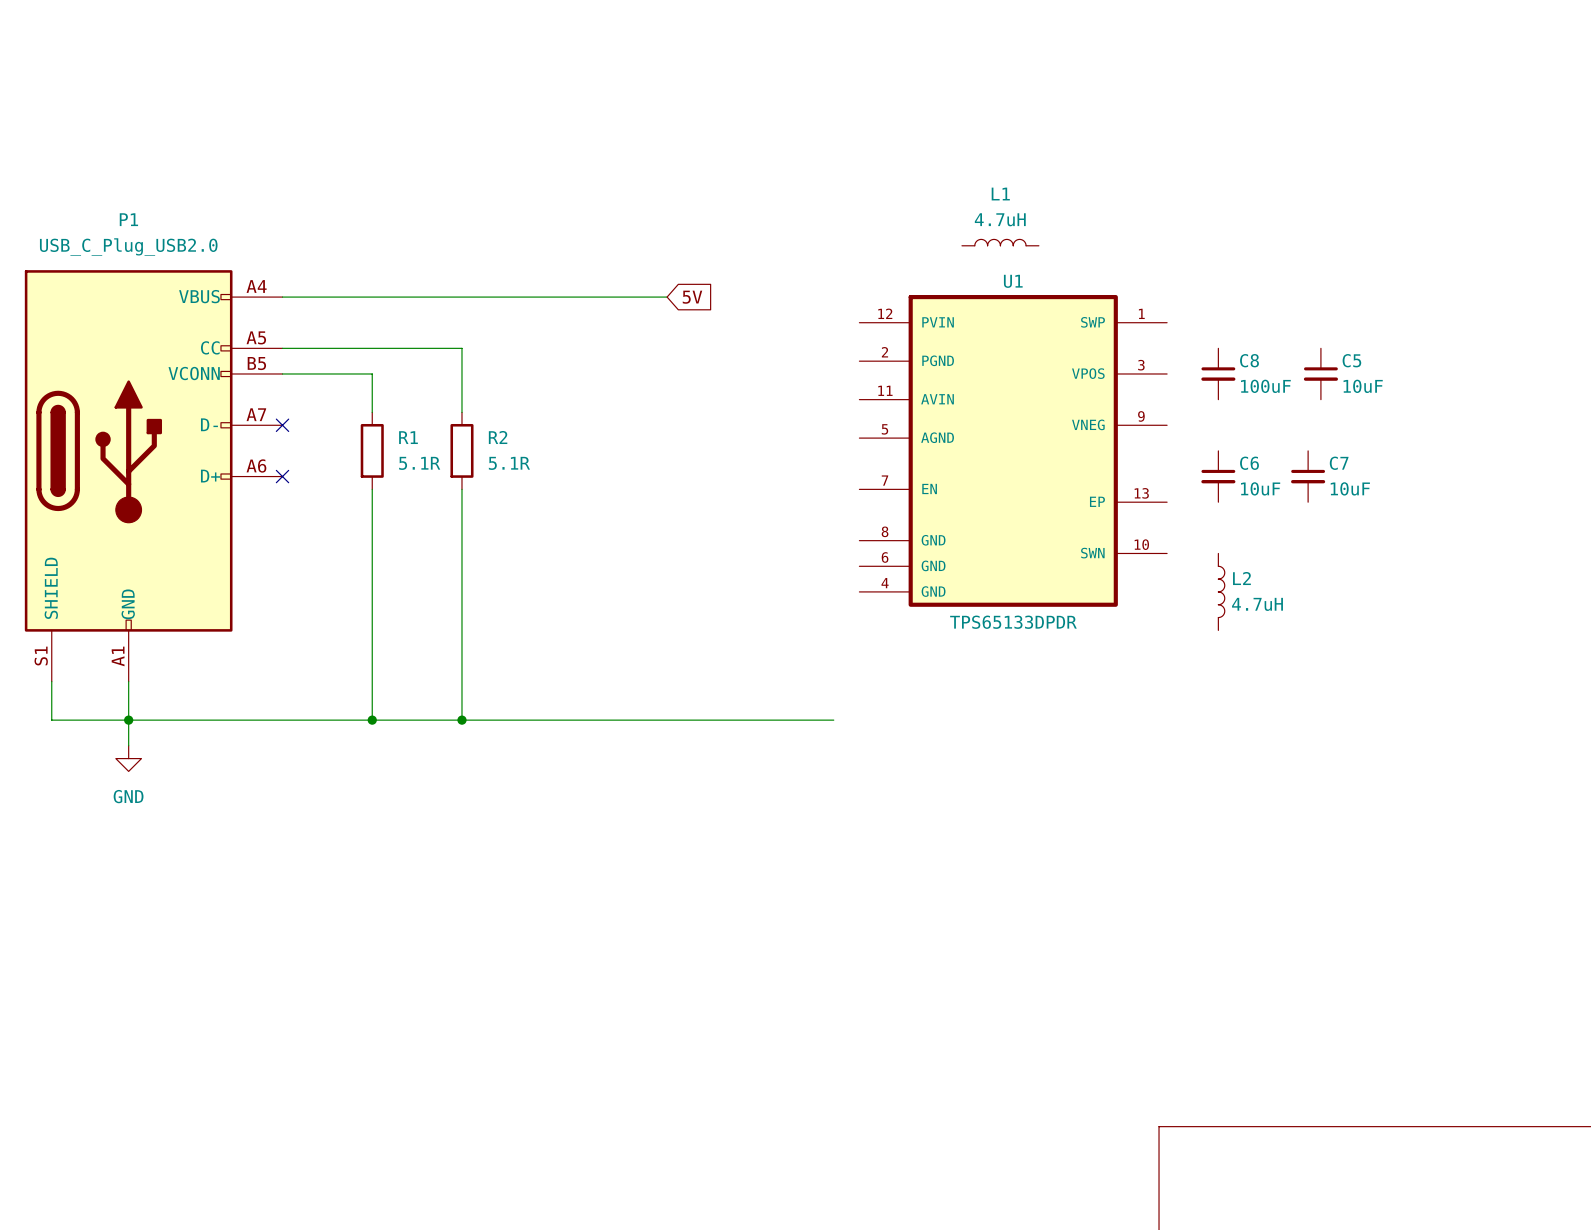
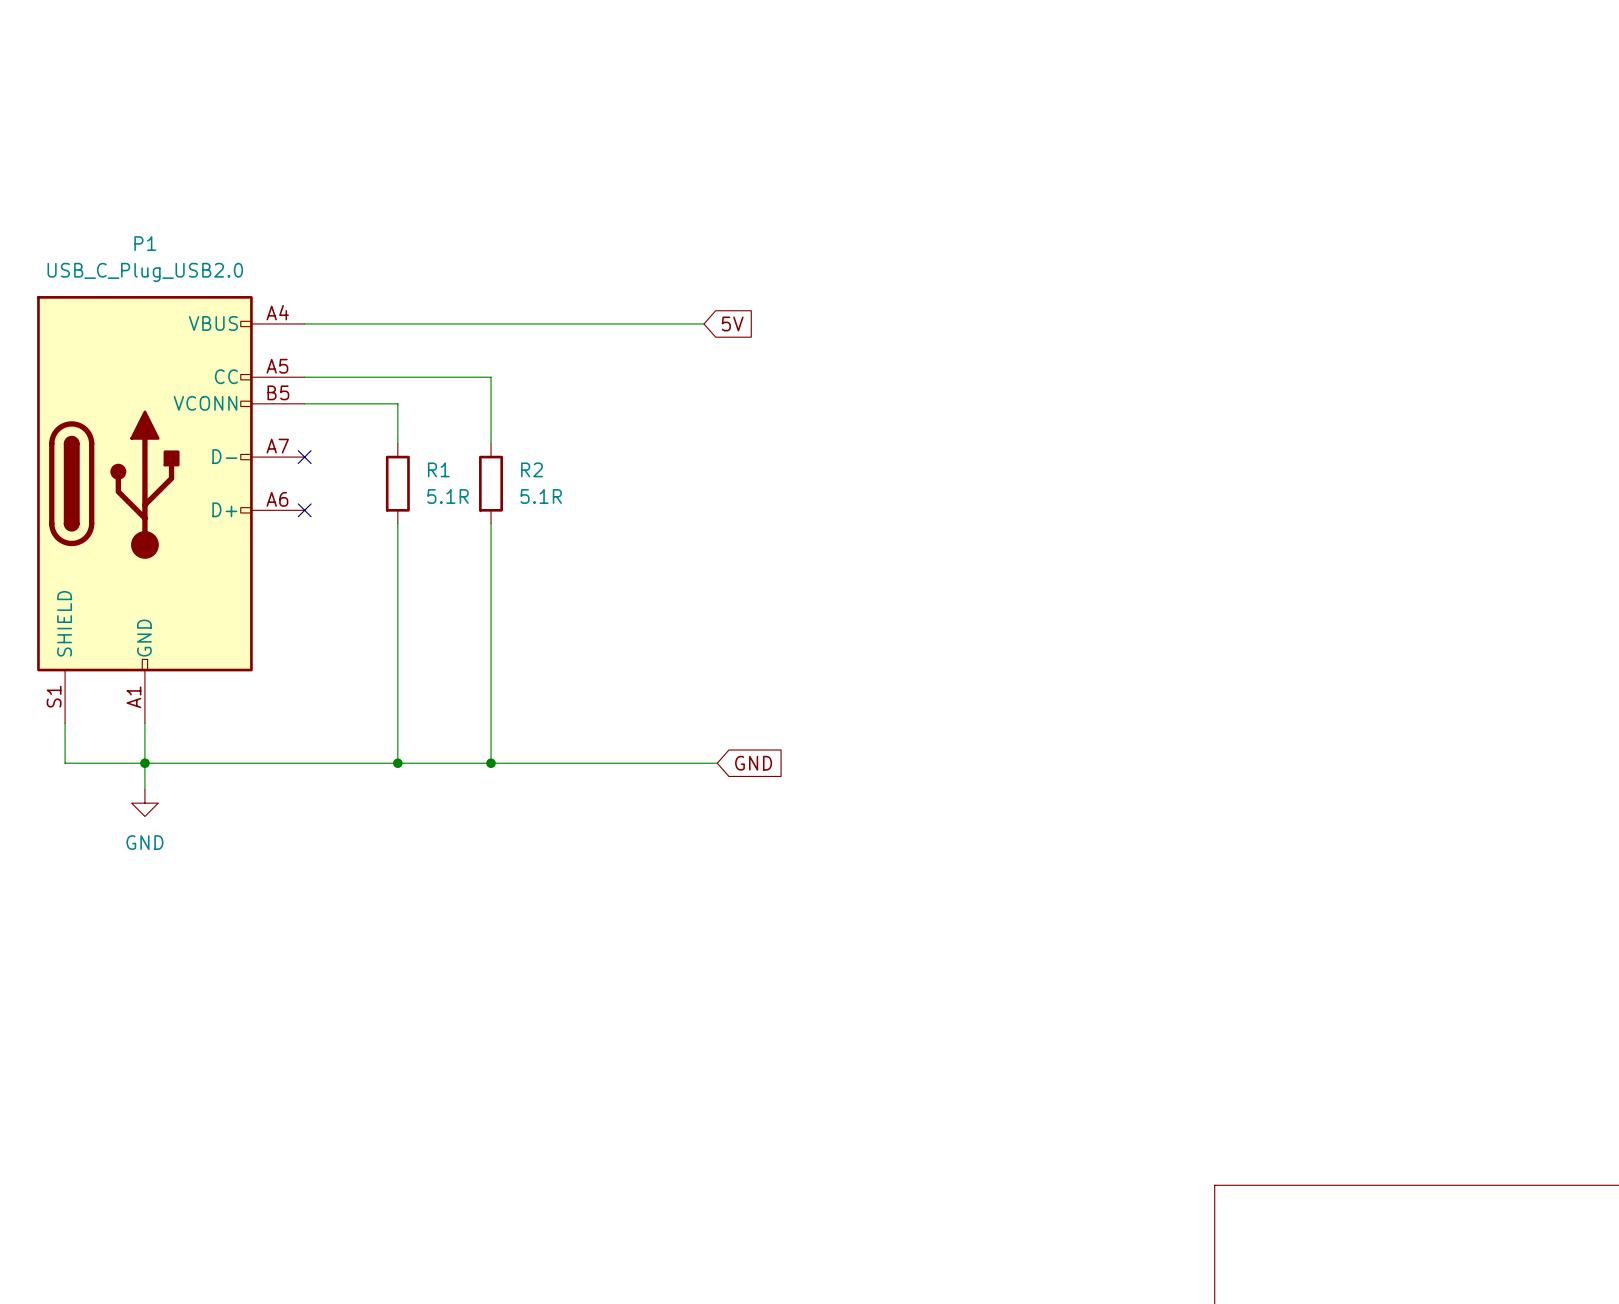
L1: 4.7uH (1000, 242) -> none
C8: 100uF (1218, 373) -> none
C5: 10uF (1320, 373) -> none
U1: TPS65133DPDR (1013, 450) -> none
C6: 10uF (1218, 476) -> none
C7: 10uF (1308, 476) -> none
L2: 4.7uH (1221, 591) -> none
wire: (679, 720) (833, 720) -> none
global label: none -> GND (753, 763)

